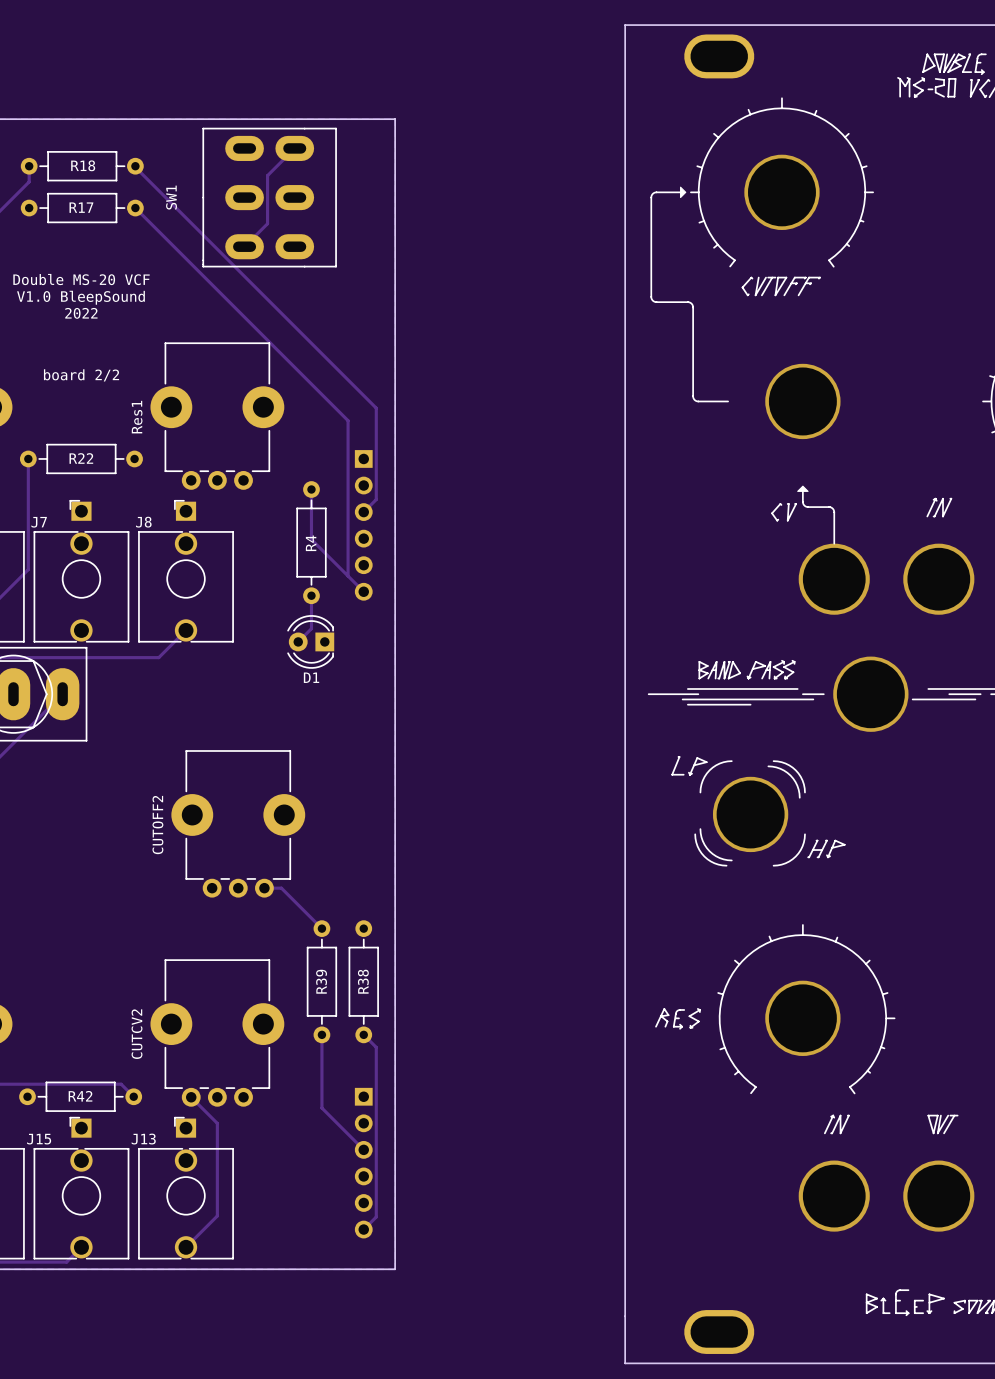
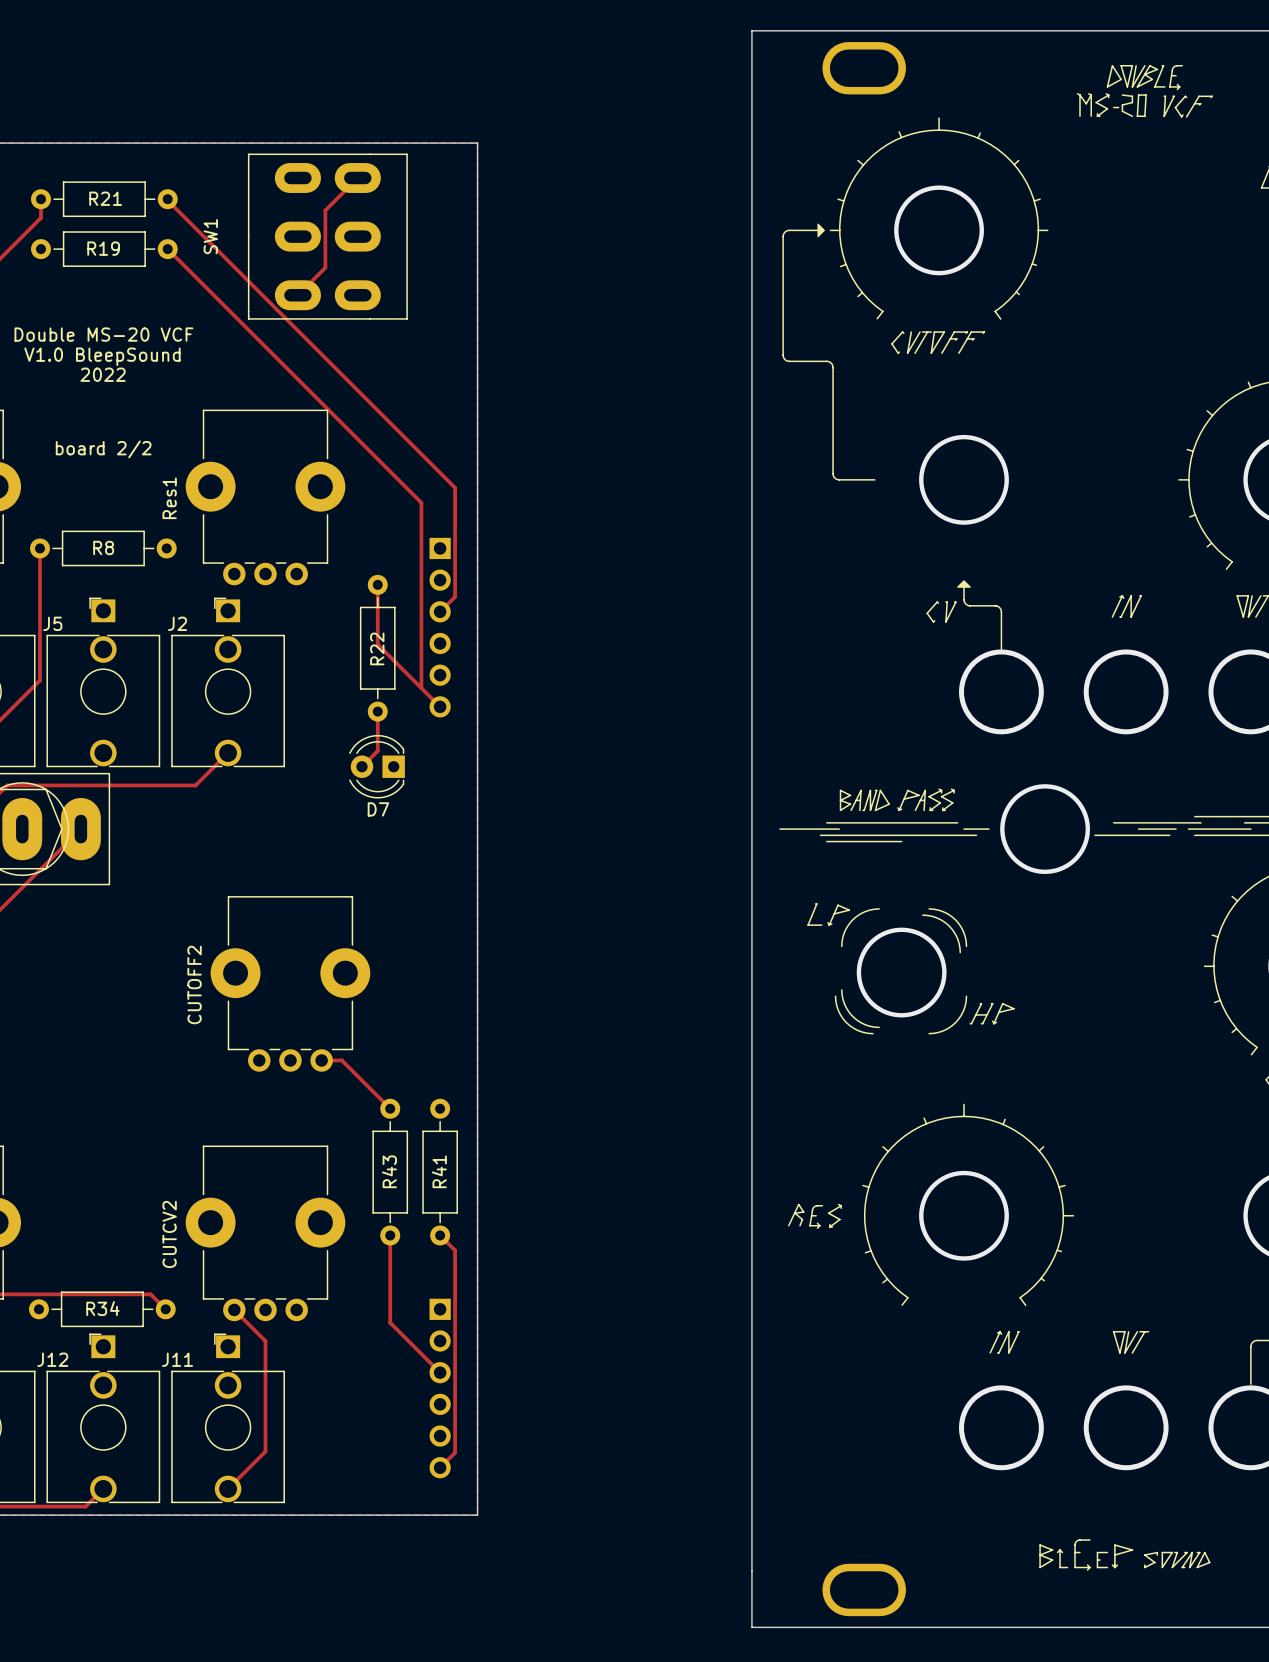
R18 name: R18 (83, 165) -> R21 (105, 198)
R17 name: R17 (81, 207) -> R19 (103, 248)
R22 name: R22 (81, 458) -> R8 (103, 547)
J7 name: J7 (39, 522) -> J5 (52, 623)
J8 name: J8 (143, 522) -> J2 (177, 623)
R4 name: R4 (311, 543) -> R22 (377, 648)
D1 name: D1 (311, 677) -> D7 (378, 809)
R39 name: R39 (321, 981) -> R43 (389, 1171)
R38 name: R38 (363, 981) -> R41 (439, 1171)
R42 name: R42 (80, 1096) -> R34 (102, 1308)
J15 name: J15 (39, 1139) -> J12 (52, 1359)
J13 name: J13 (143, 1139) -> J11 (177, 1359)

